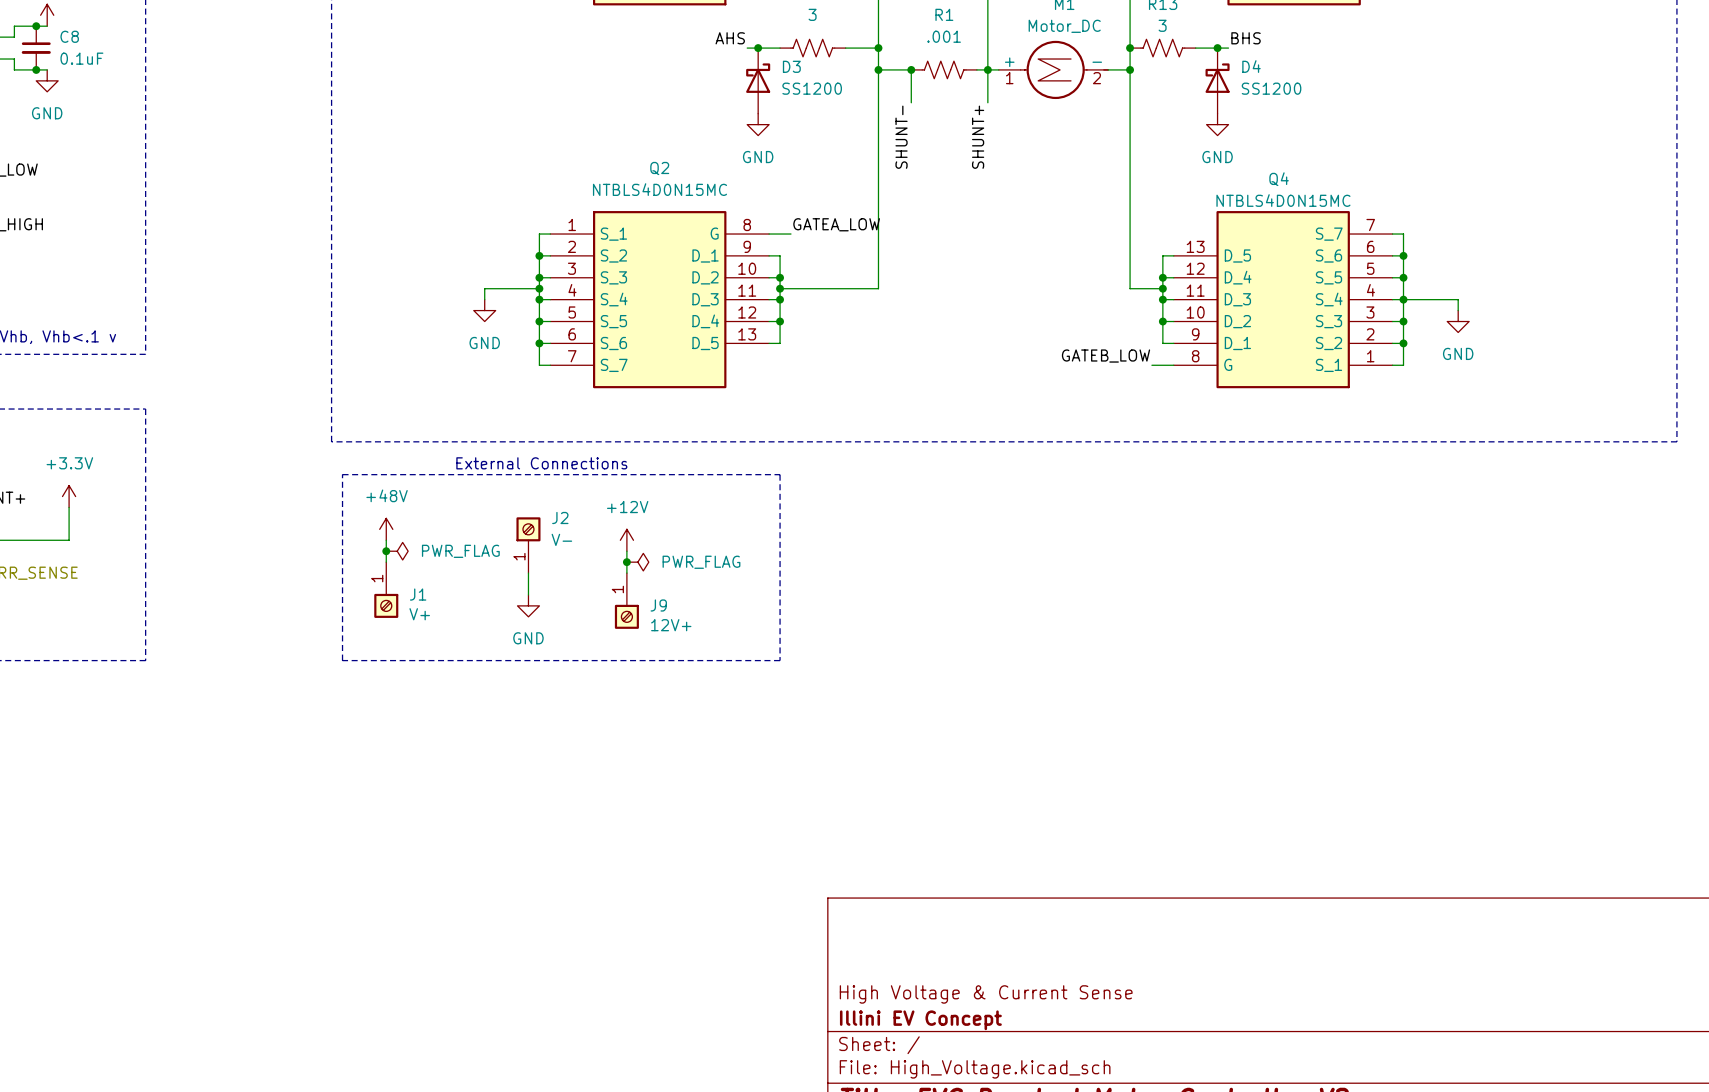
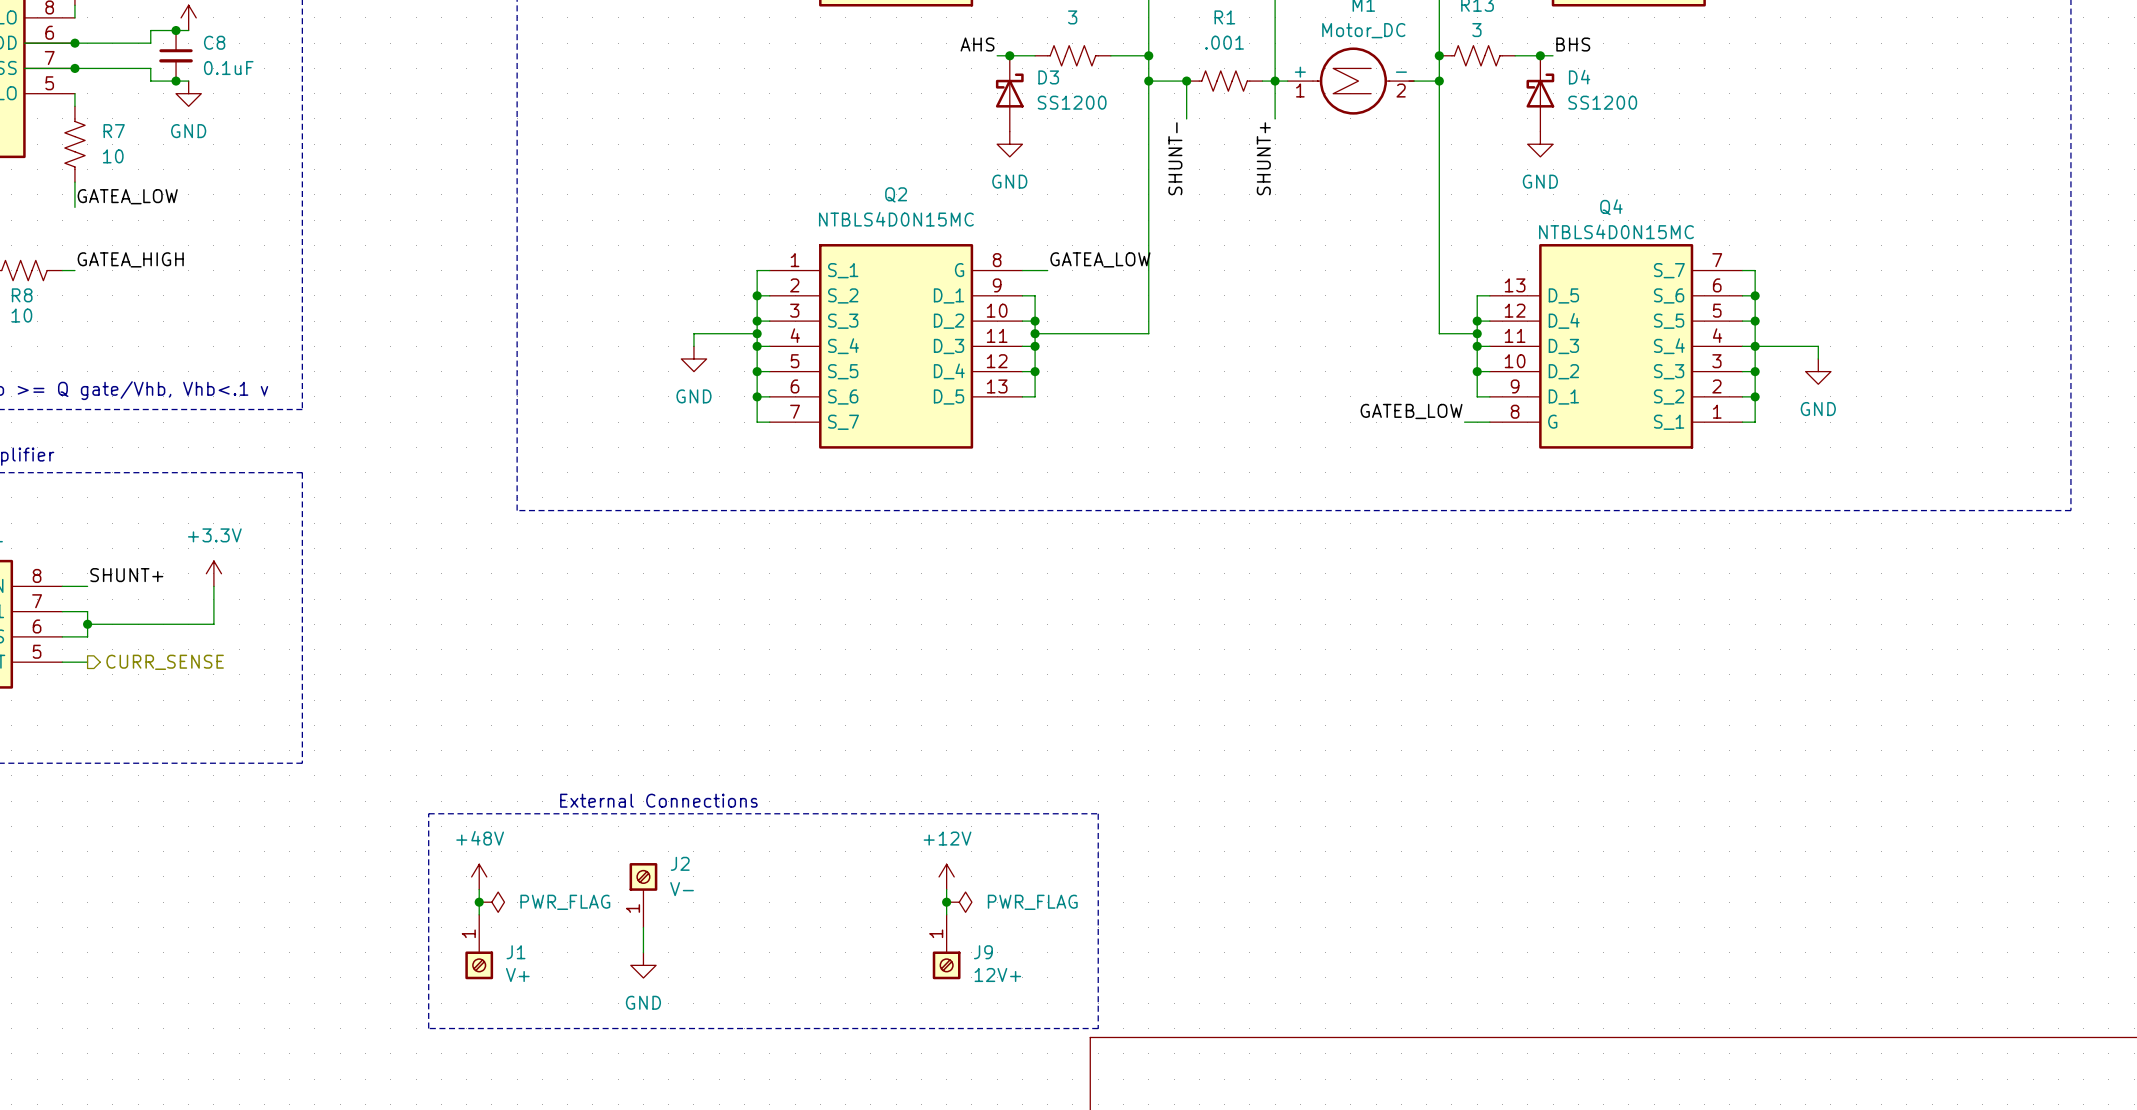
text: External Connections (541, 463) -> none
line: (342, 474) (780, 474) (780, 660) (342, 660) (342, 474) -> none
power symbol: +48V (386, 529) -> none
wire: (386, 540) (386, 562) -> none
power symbol: +12V (626, 540) -> none
J2 position: (528, 545) -> (643, 895)
junction: (386, 551) -> none
power symbol: PWR_FLAG (397, 551) -> none
wire: (626, 551) (626, 573) -> none
junction: (626, 562) -> none
power symbol: PWR_FLAG (637, 562) -> none
wire: (528, 573) (528, 594) -> none
J1 position: (386, 590) -> (479, 947)
J9 position: (626, 600) -> (946, 947)
power symbol: GND (528, 605) -> none
text: none -> External Connections (658, 800)
line: none -> (428, 813) (1098, 813) (1098, 1028) (428, 1028) (428, 813)
power symbol: none -> +48V (479, 876)
power symbol: none -> +12V (946, 876)
wire: none -> (479, 889) (479, 914)
wire: none -> (946, 889) (946, 914)
junction: none -> (479, 902)
power symbol: none -> PWR_FLAG (491, 902)
junction: none -> (946, 902)
power symbol: none -> PWR_FLAG (959, 902)
wire: none -> (643, 927) (643, 952)
power symbol: none -> GND (643, 965)

